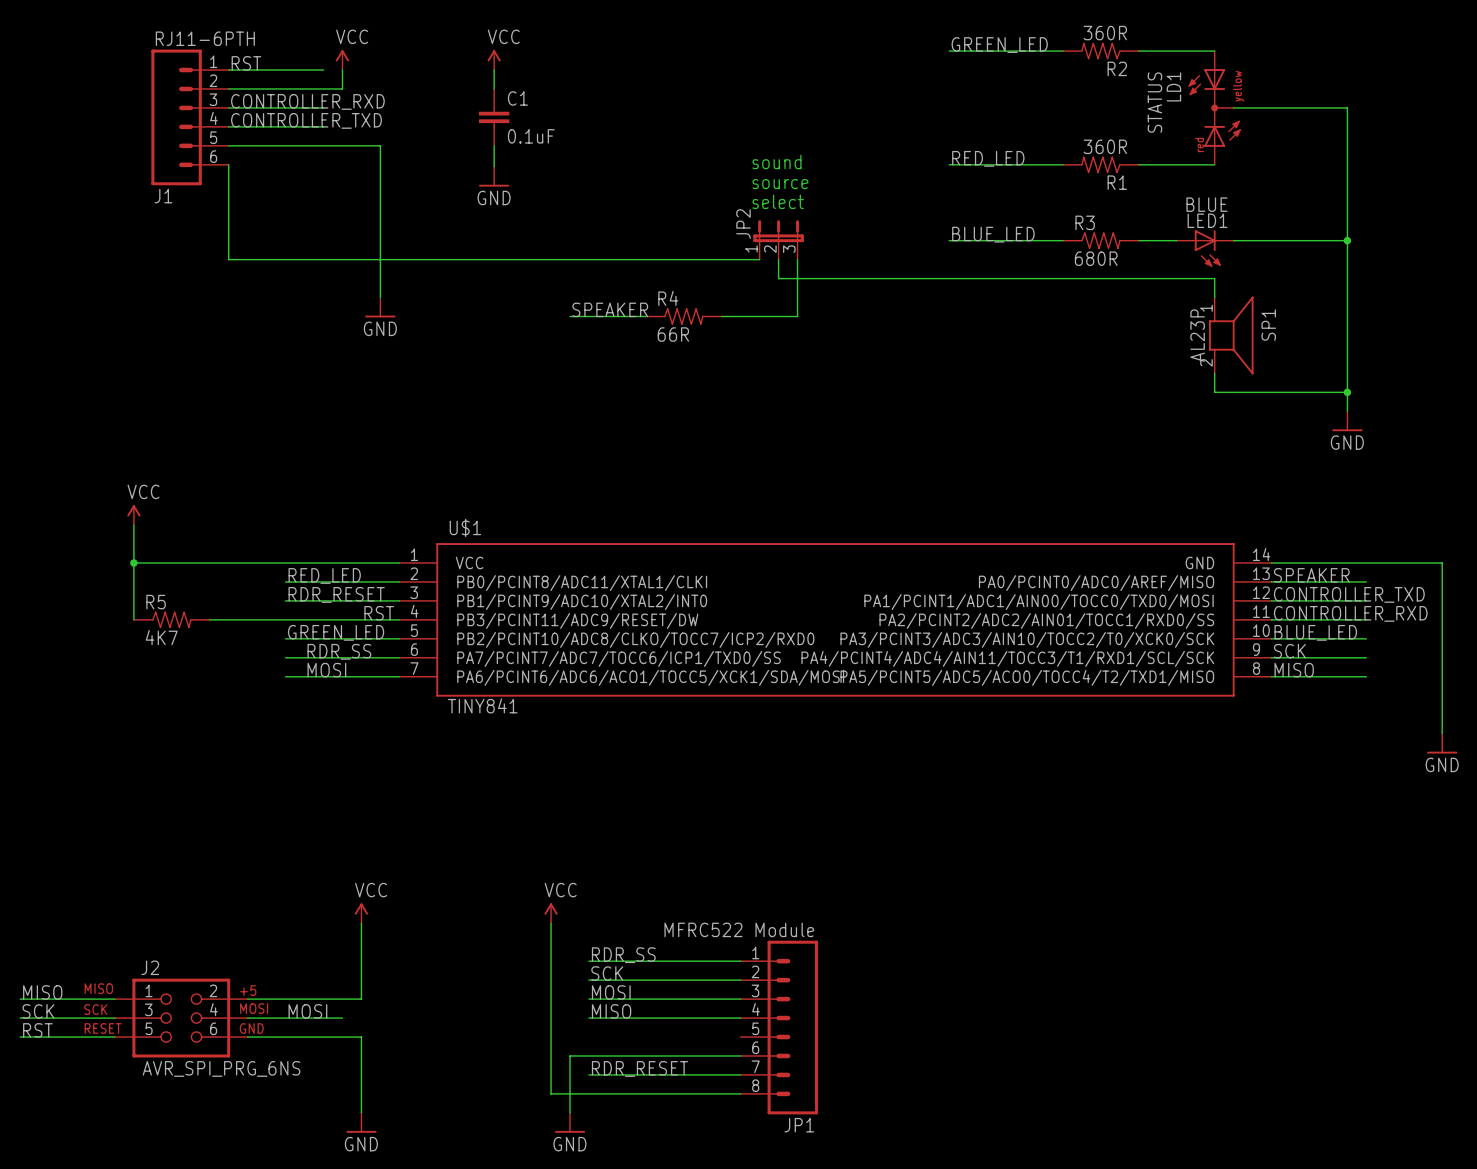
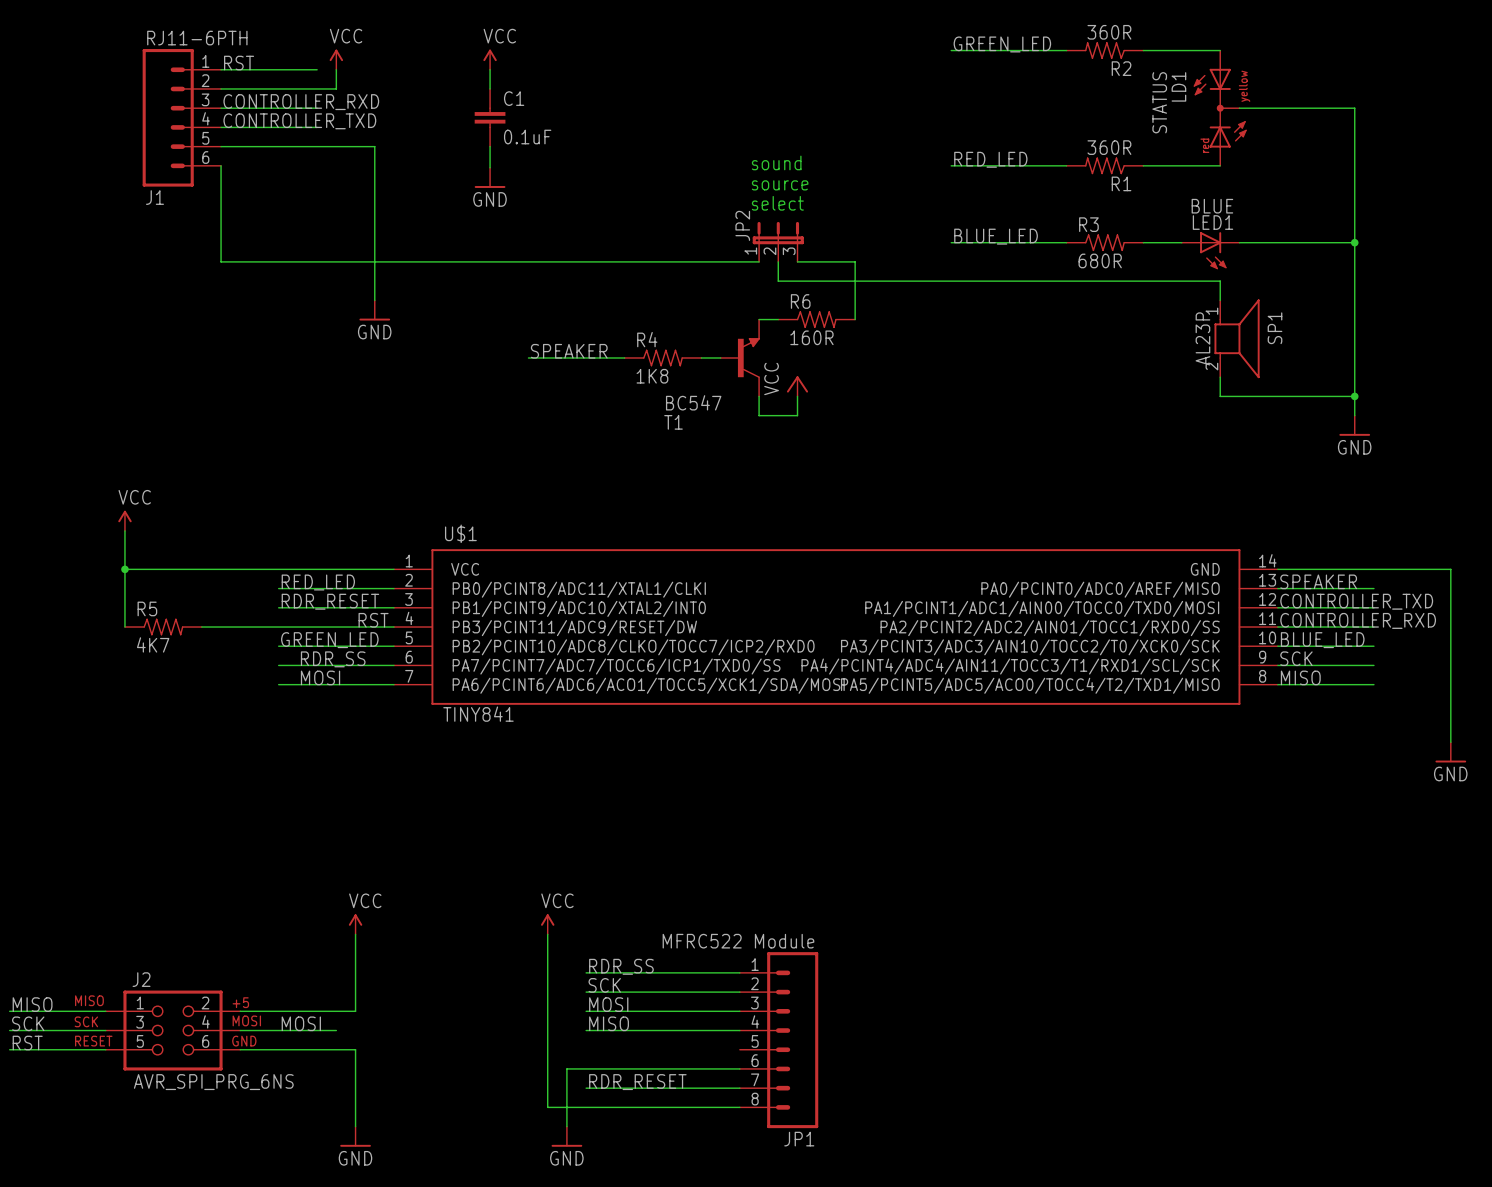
wire: (797, 259) (797, 316) (778, 316) -> (797, 261) (855, 261) (855, 319)
label position: SPEAKER (610, 309) -> SPEAKER (569, 351)
wire: (570, 316) (645, 316) -> none
R4 position: (683, 316) -> (662, 357)
wire: (721, 316) (759, 316) -> none
R6: none -> 160R (816, 319)
R4 value: 66R (673, 334) -> 1K8 (652, 376)
wire: none -> (528, 357) (624, 357)
wire: none -> (701, 357) (720, 357)
T1: none -> BC547 (740, 357)
power symbol: none -> VCC (797, 386)
wire: none -> (759, 396) (759, 415) (797, 415) (797, 396)

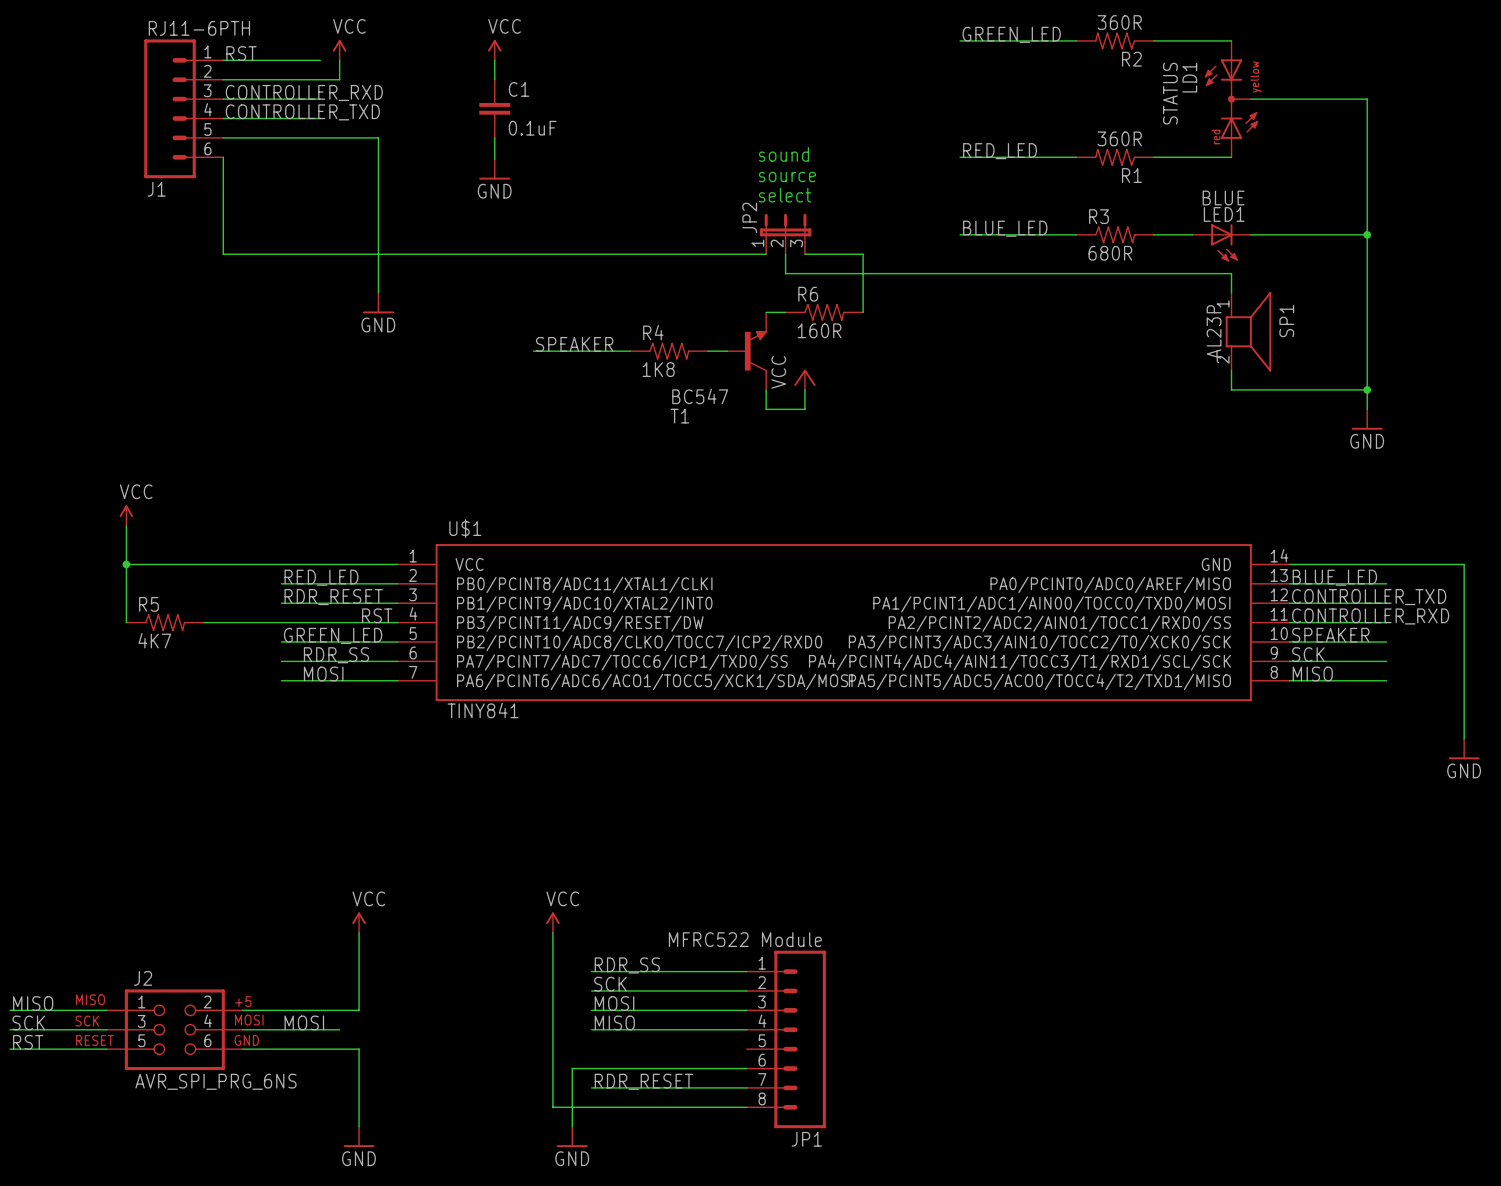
label: SPEAKER (1318, 581) -> BLUE_LED (1334, 577)
label: BLUE_LED (1322, 640) -> SPEAKER (1330, 635)

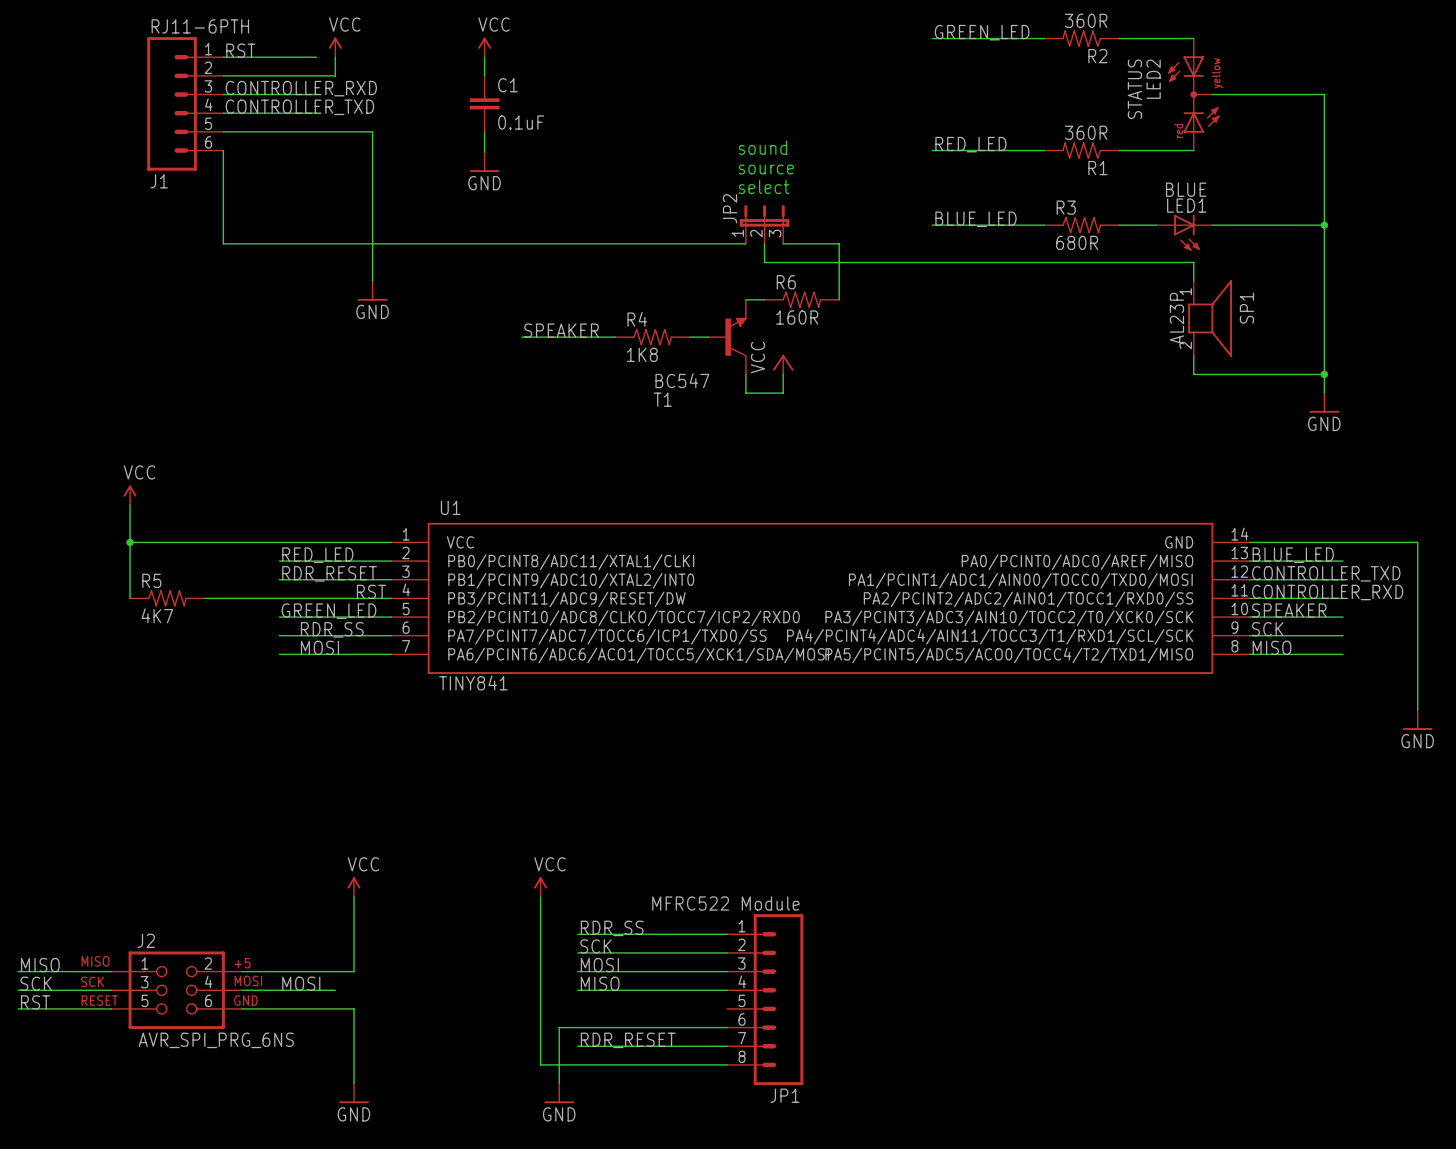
LD1 name: LD1 (1189, 77) -> LED2 (1153, 79)
U$1 name: U$1 (465, 528) -> U1 (450, 507)

